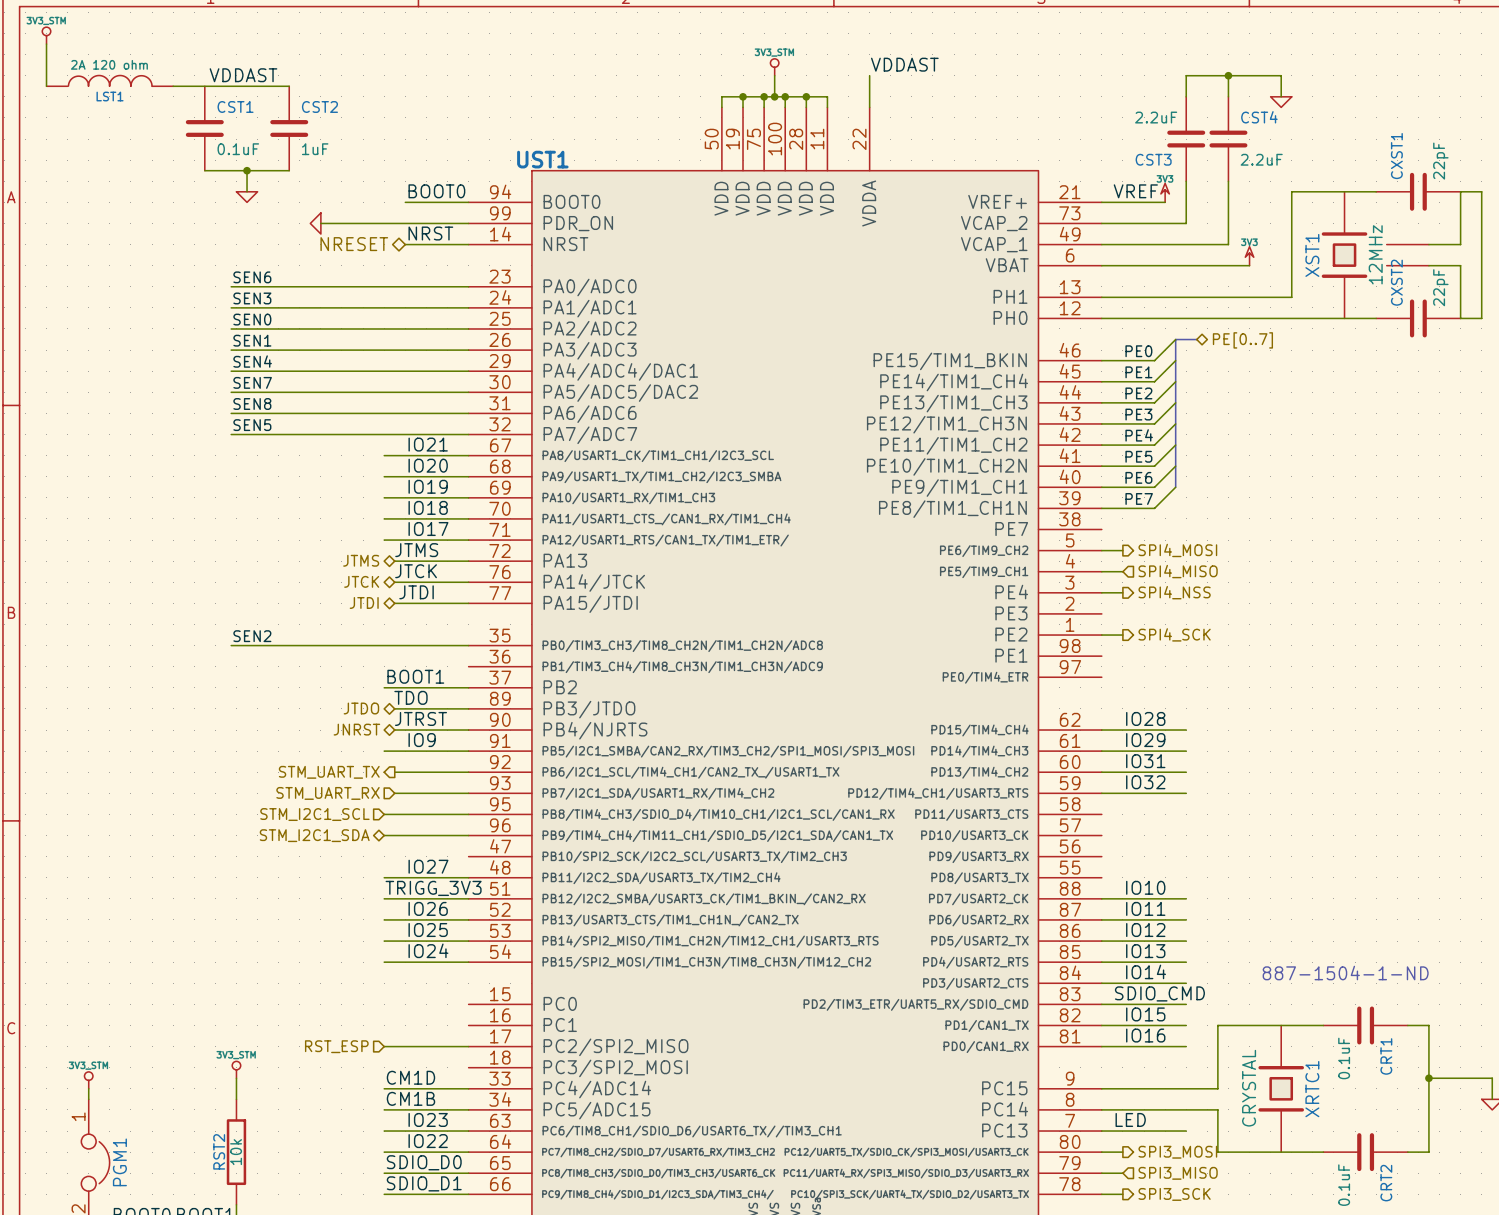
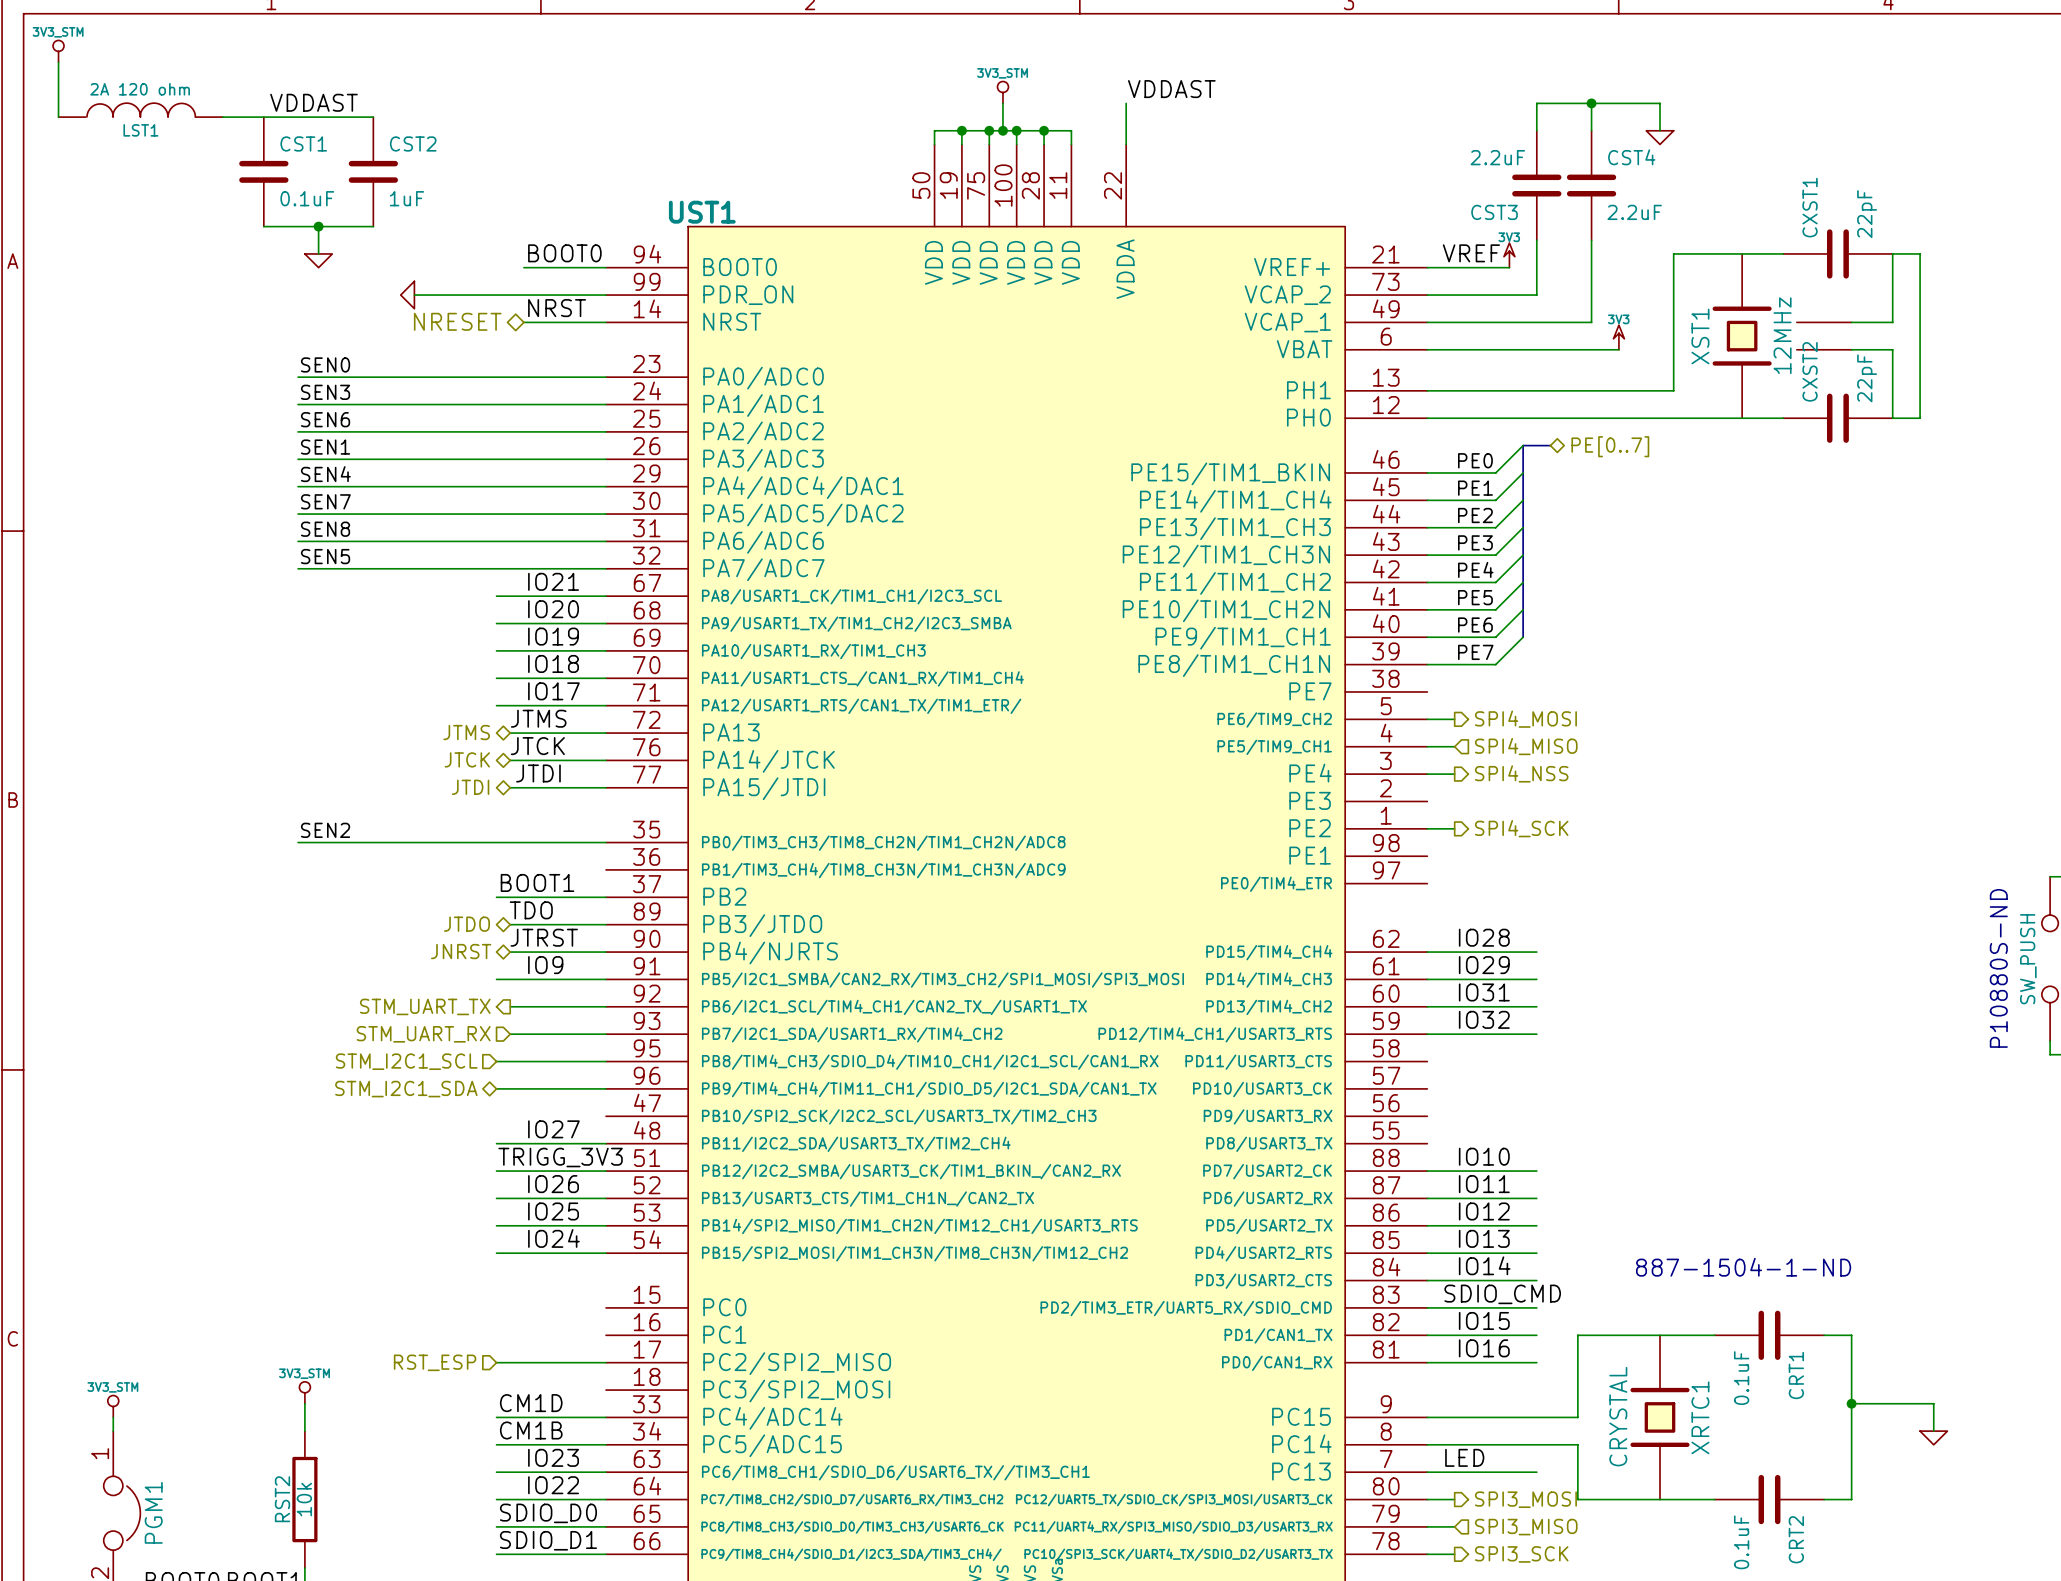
label: SEN6 (252, 277) -> SEN0 (325, 364)
label: SEN0 (252, 319) -> SEN6 (325, 419)

